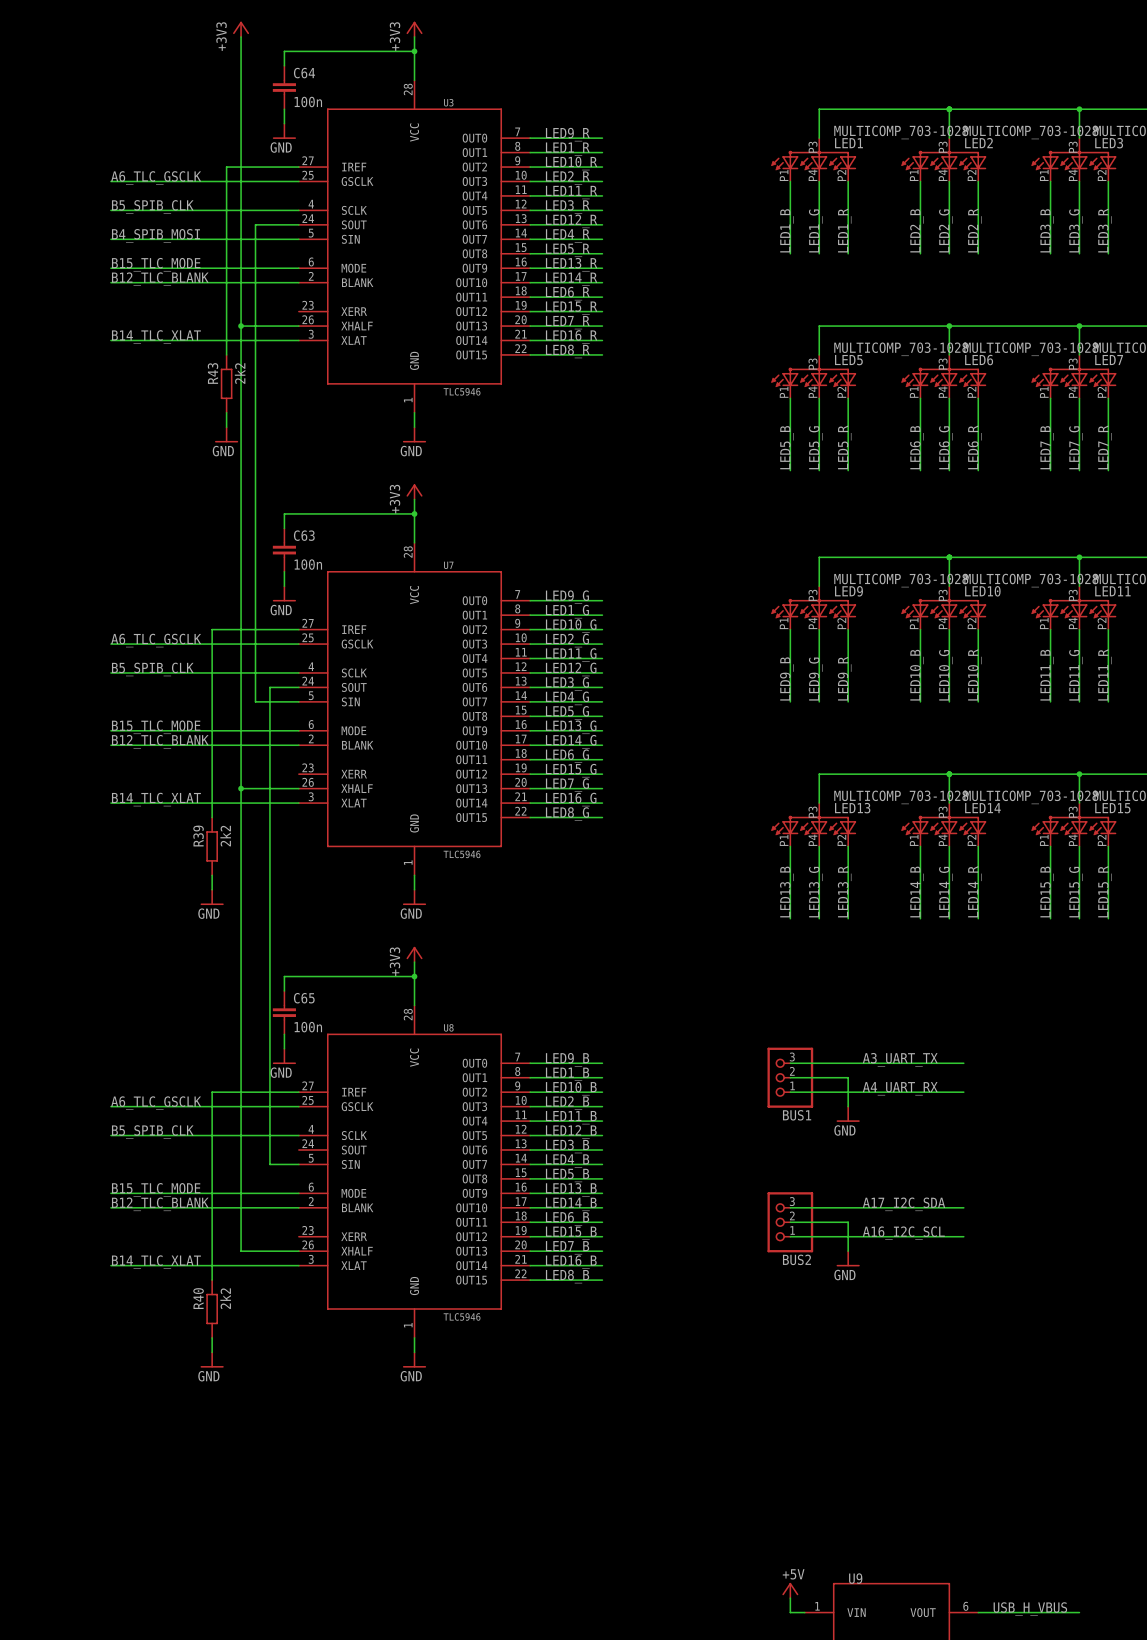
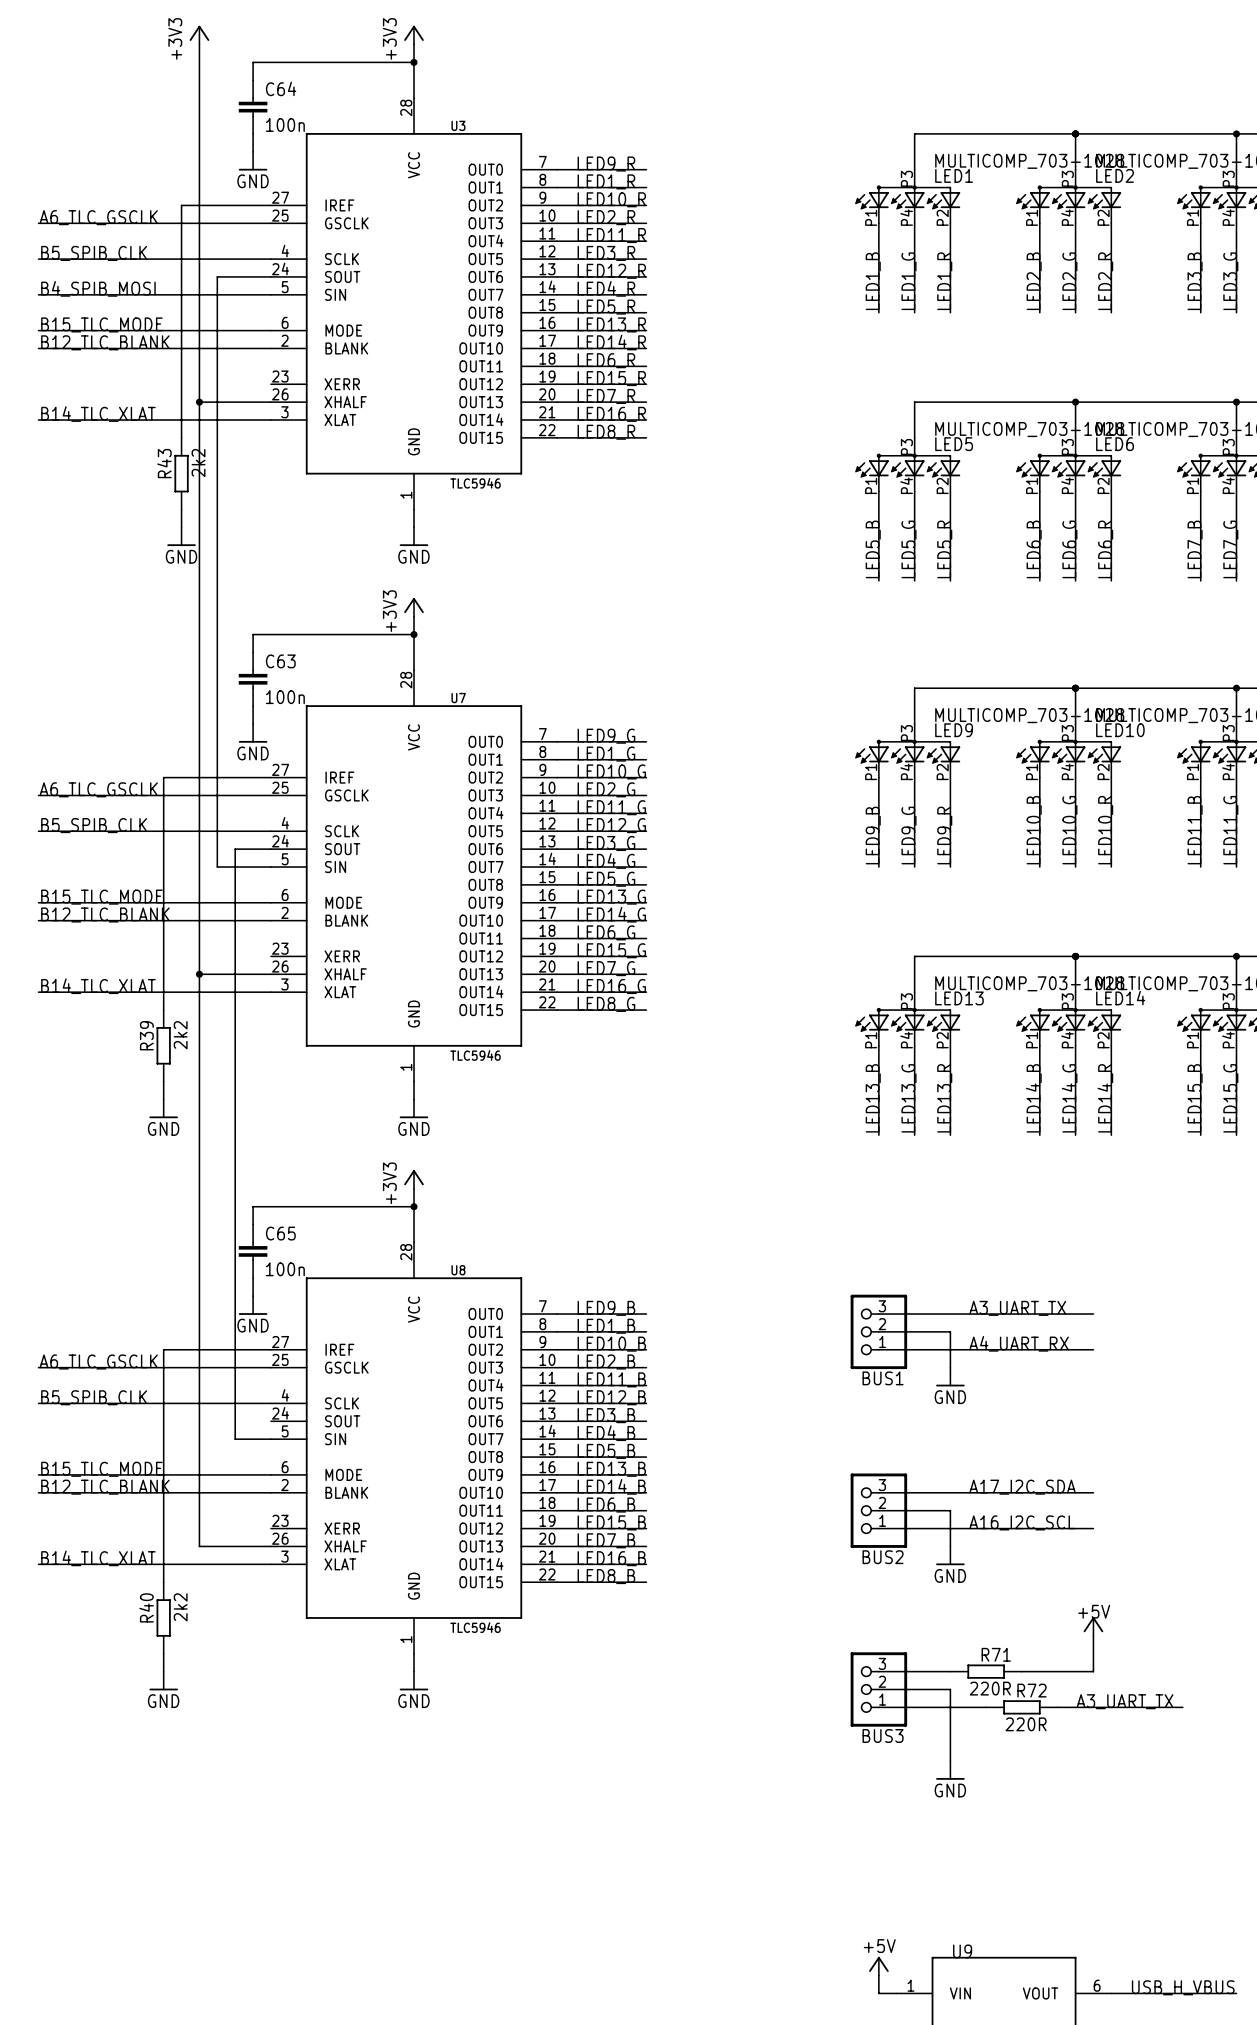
power symbol: none -> +5V (1093, 1626)
wire: none -> (1093, 1635) (1093, 1671) (1021, 1671)
wire: none -> (878, 1671) (950, 1671)
R71: none -> 220R (986, 1671)
wire: none -> (878, 1689) (950, 1689) (950, 1761)
BUS3: none -> (878, 1689)
label: none -> A3_UART_TX (1125, 1701)
wire: none -> (878, 1707) (986, 1707)
R72: none -> 220R (1021, 1707)
wire: none -> (1057, 1707) (1182, 1707)
power symbol: none -> GND (950, 1770)

